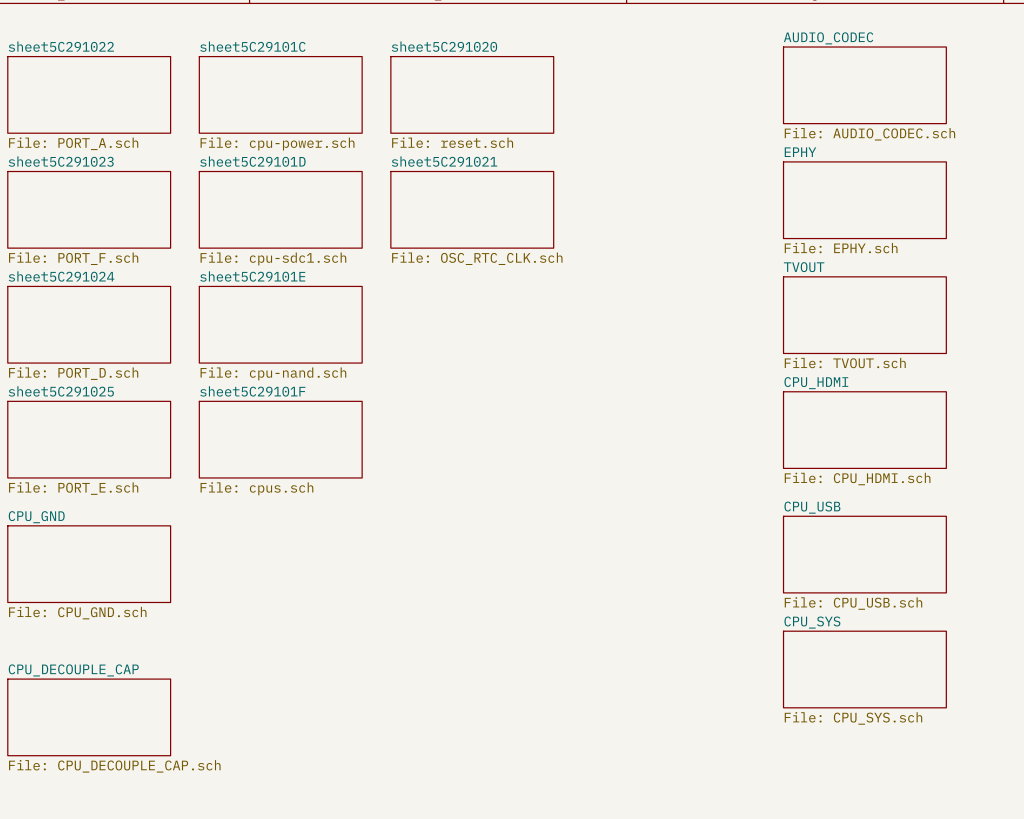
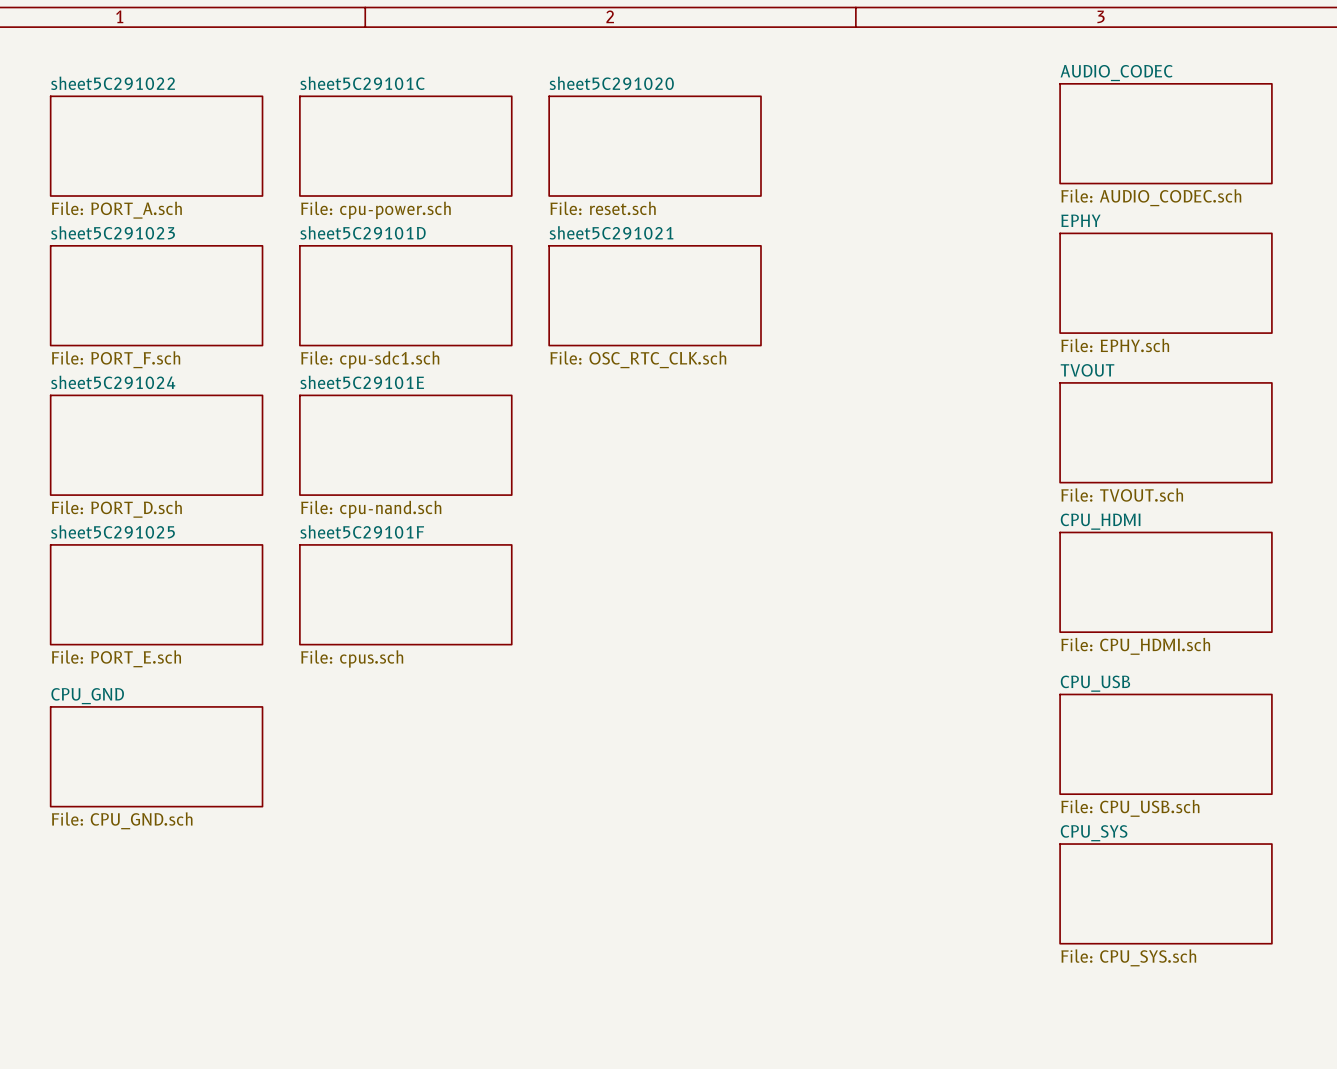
sheet CPU_DECOUPLE_CAP: File: CPU_DECOUPLE_CAP.sch (89, 717) -> none

